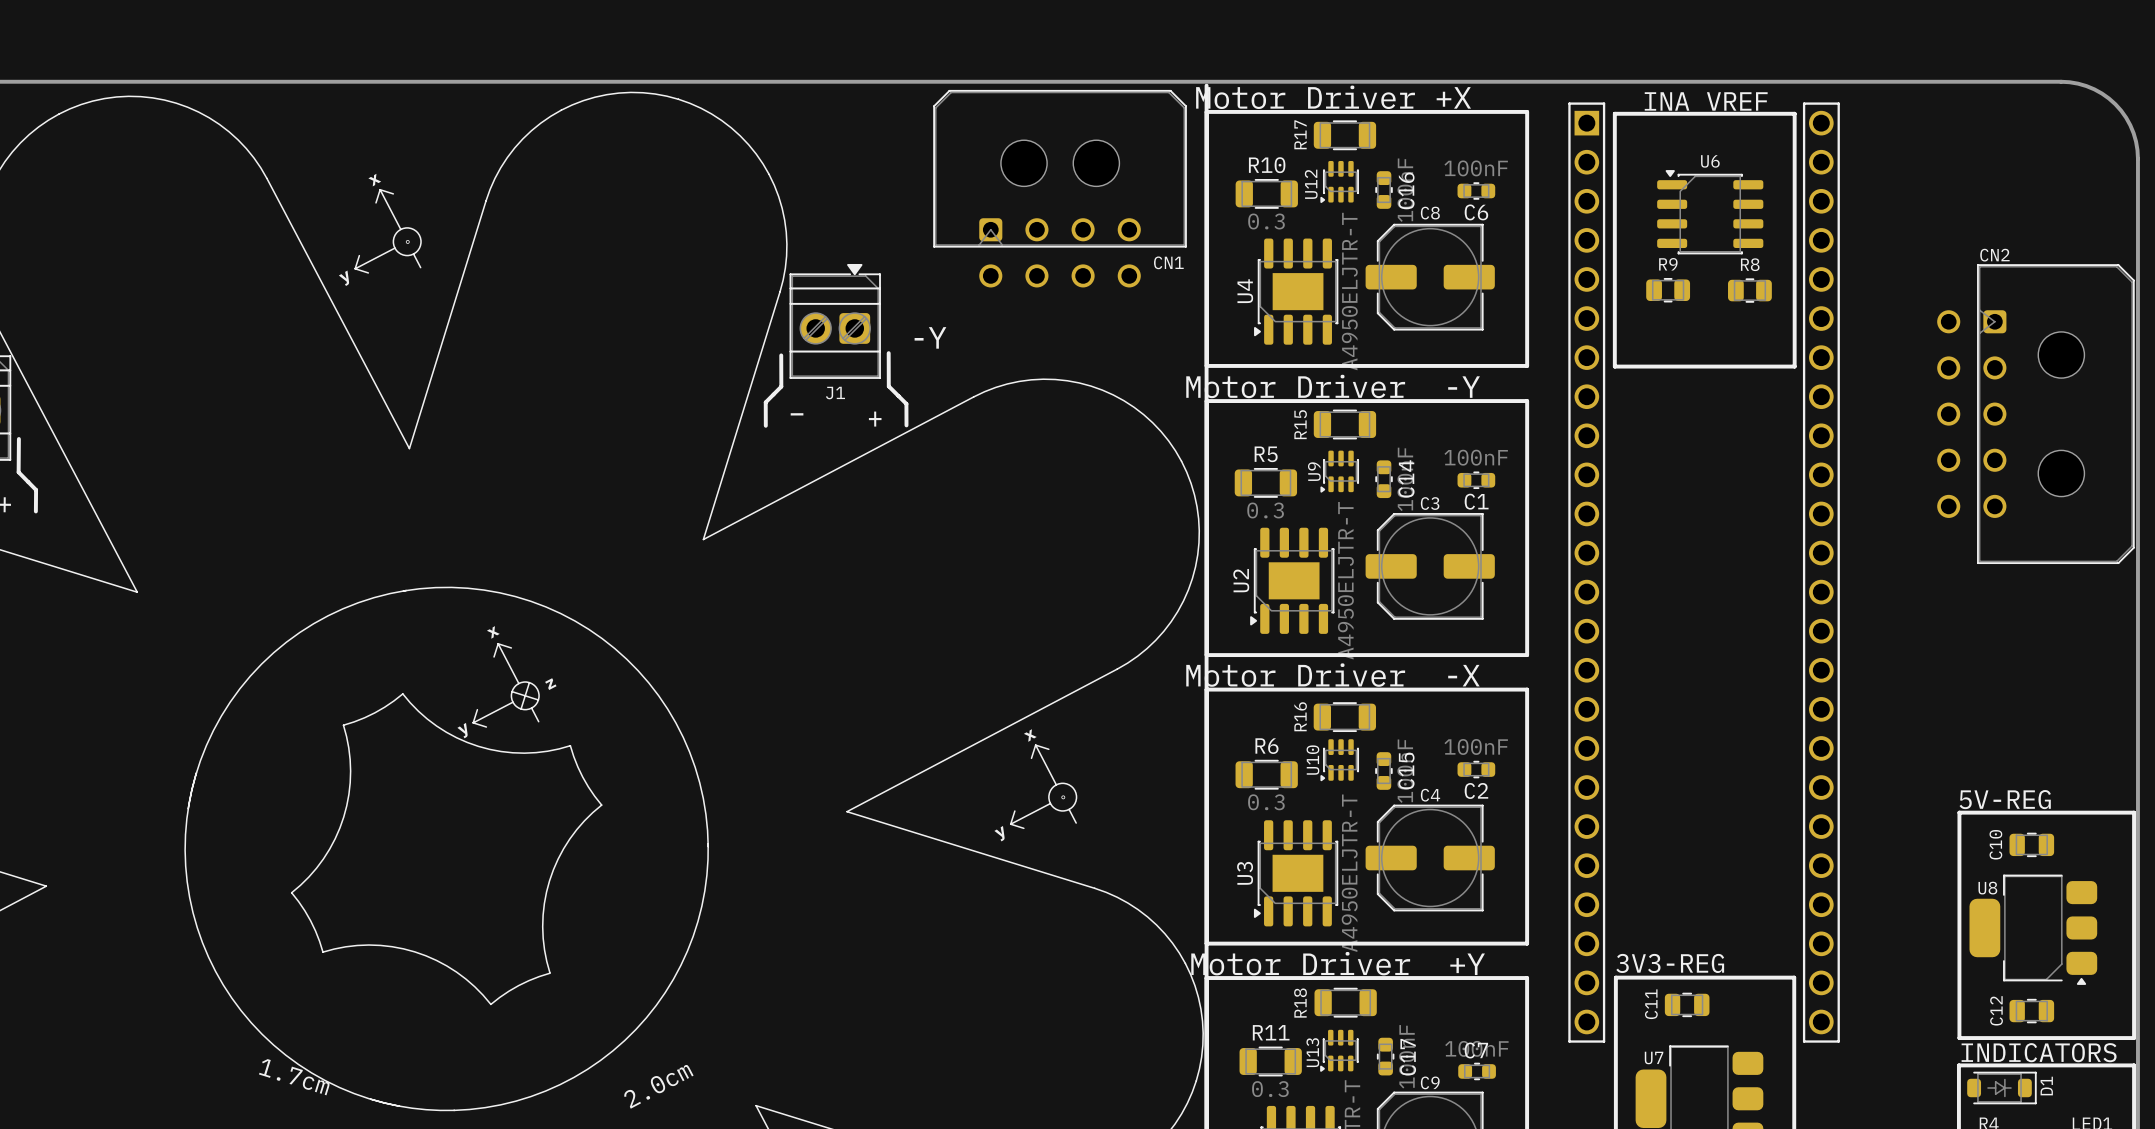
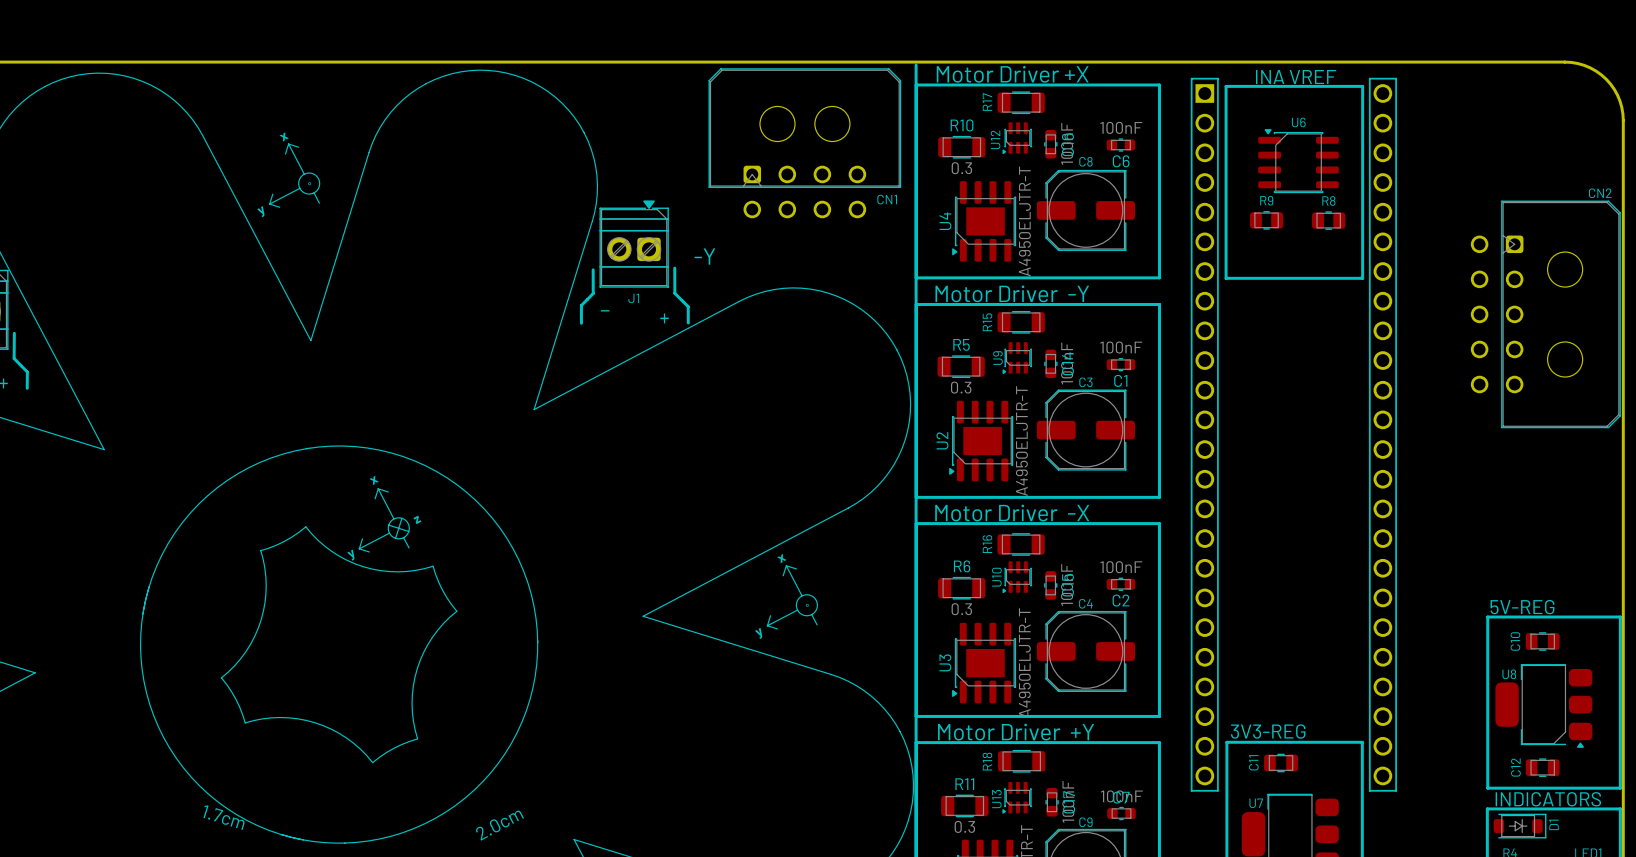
CN2 name position: CN2 (1994, 255) -> CN2 (1600, 193)

